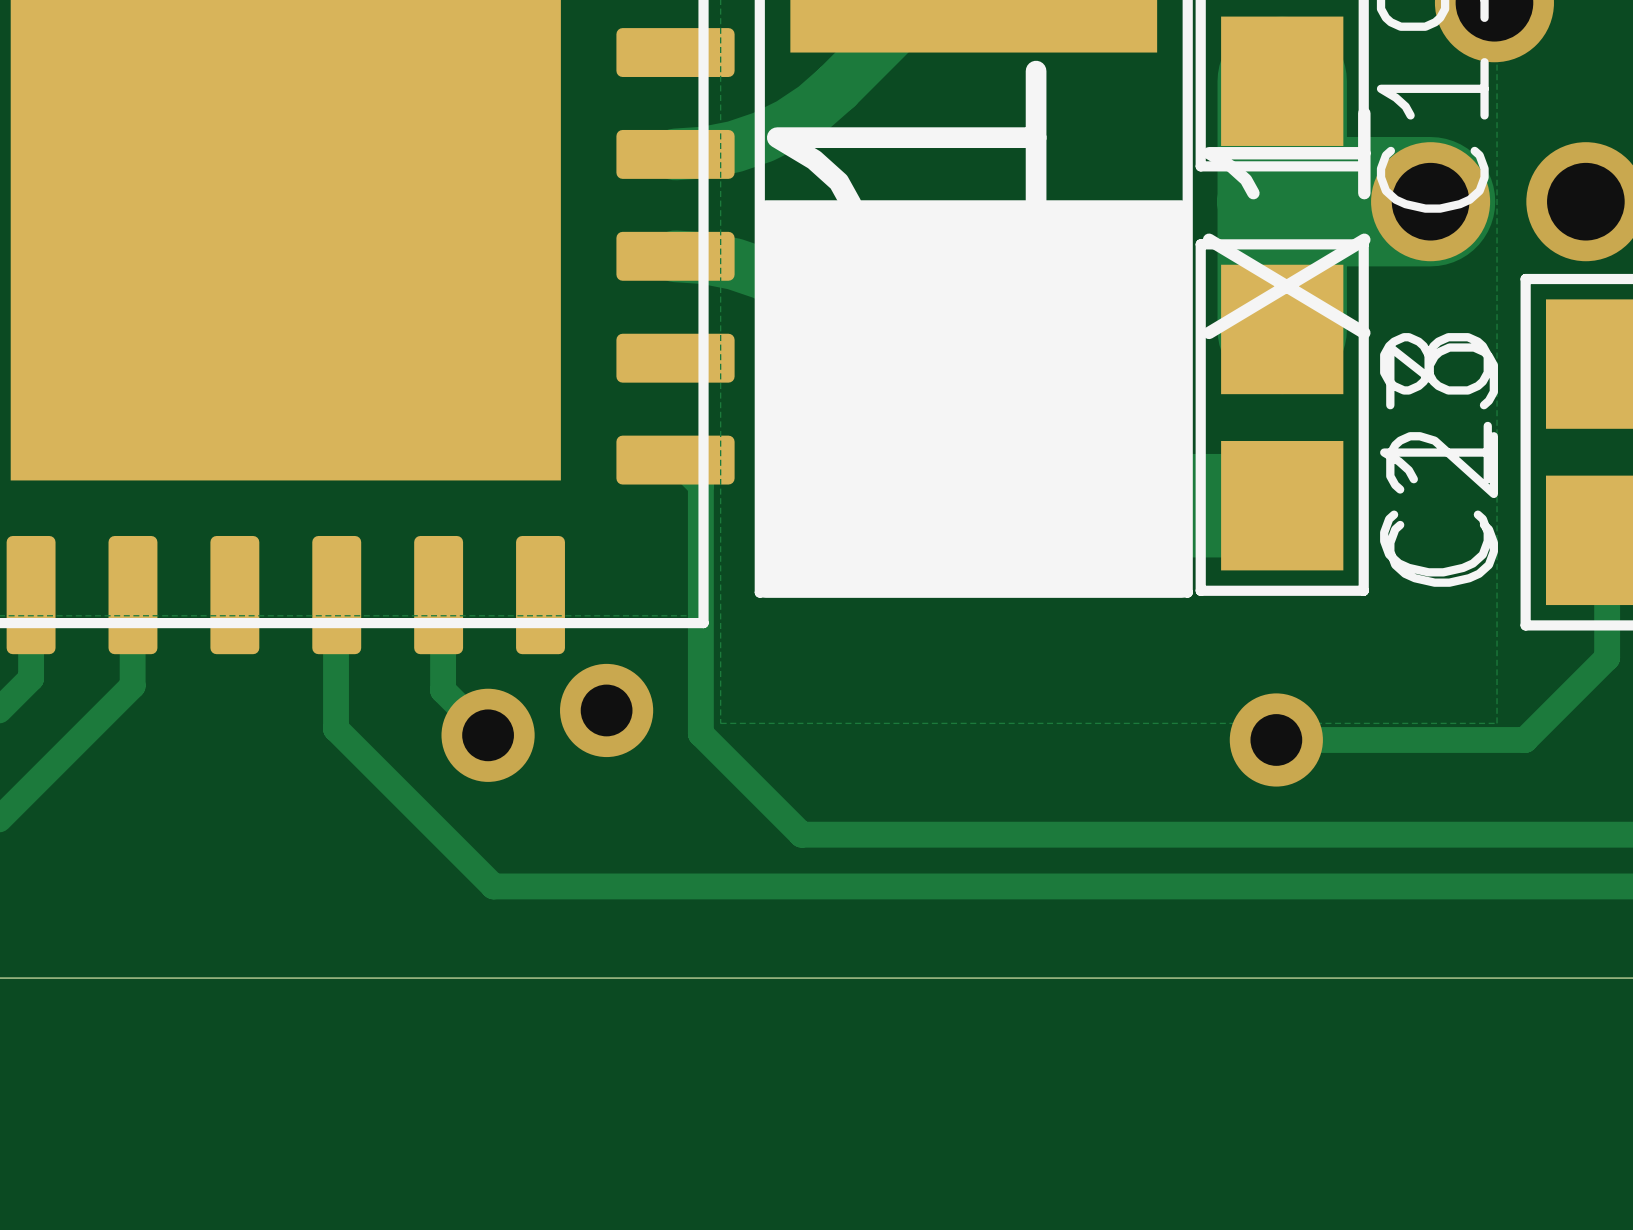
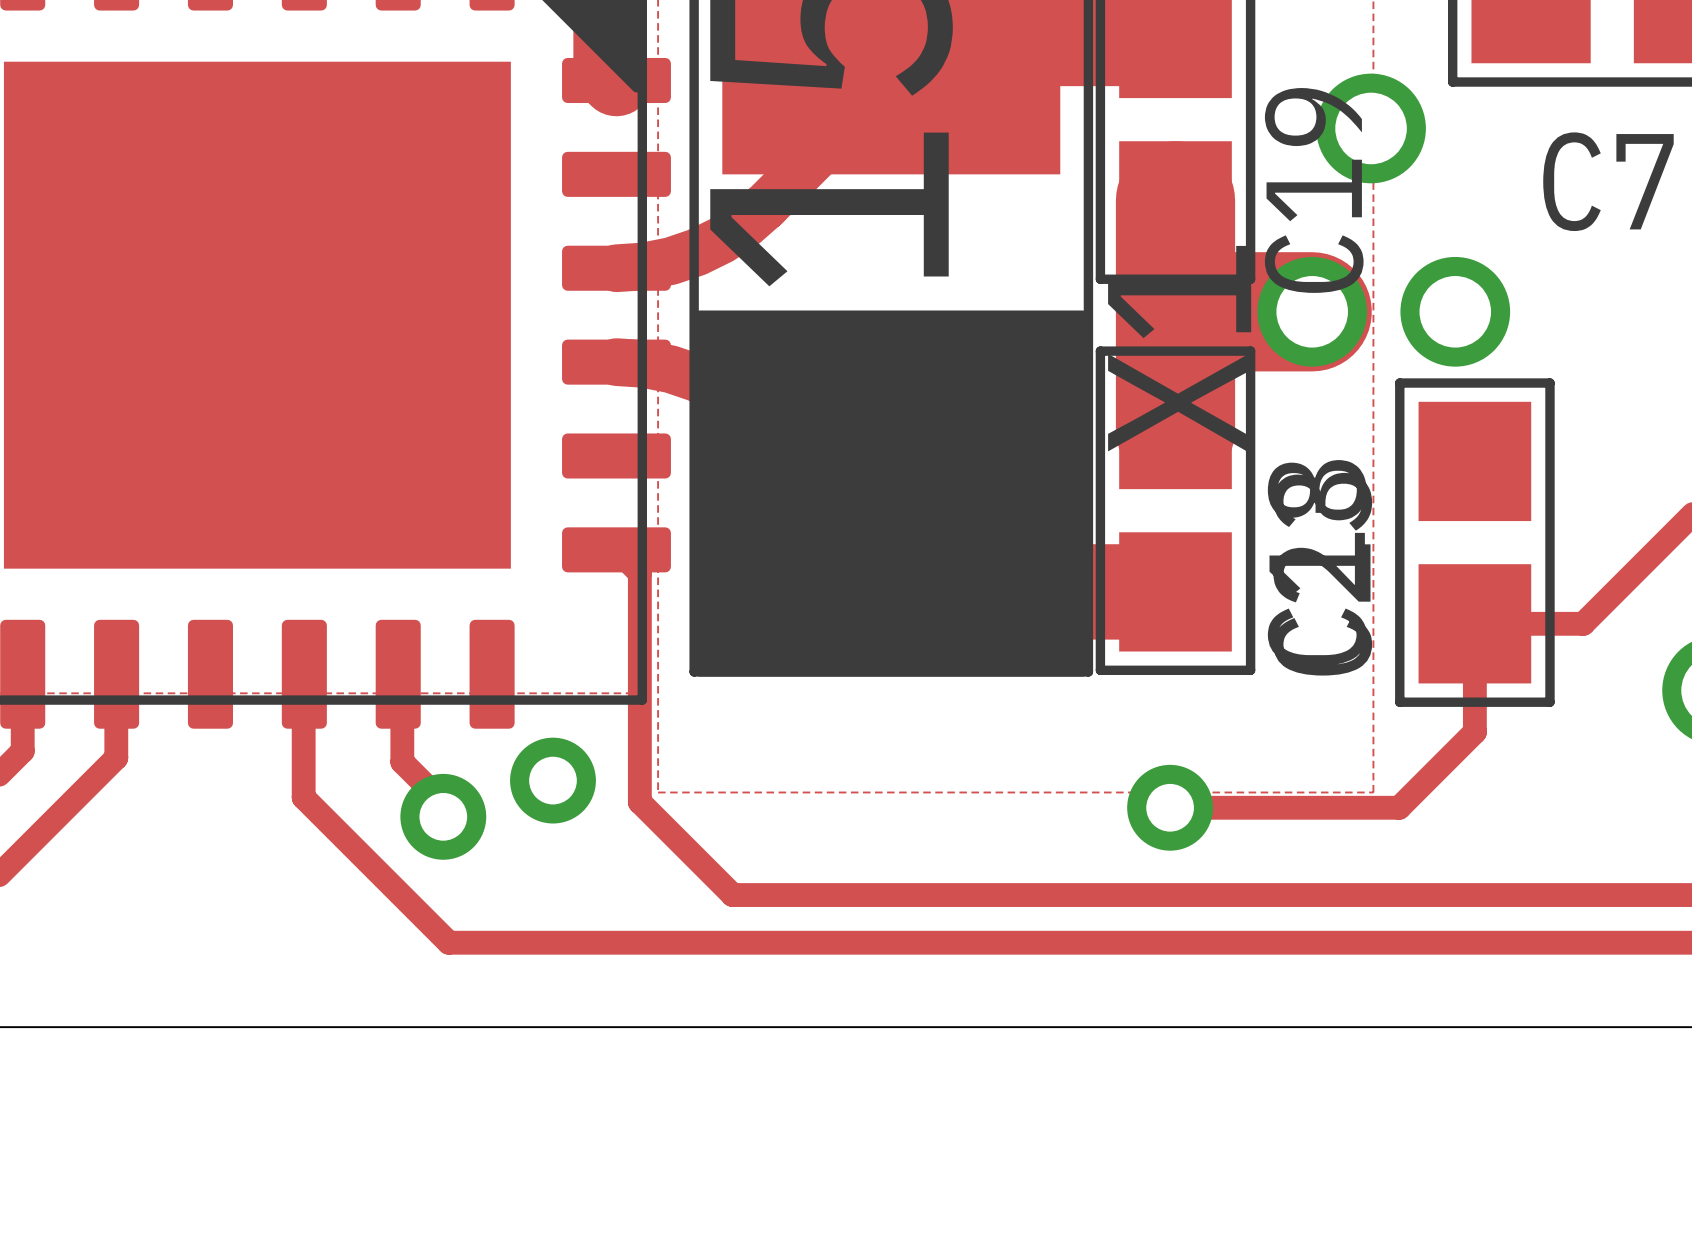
via position: (488, 735) -> (443, 816)

